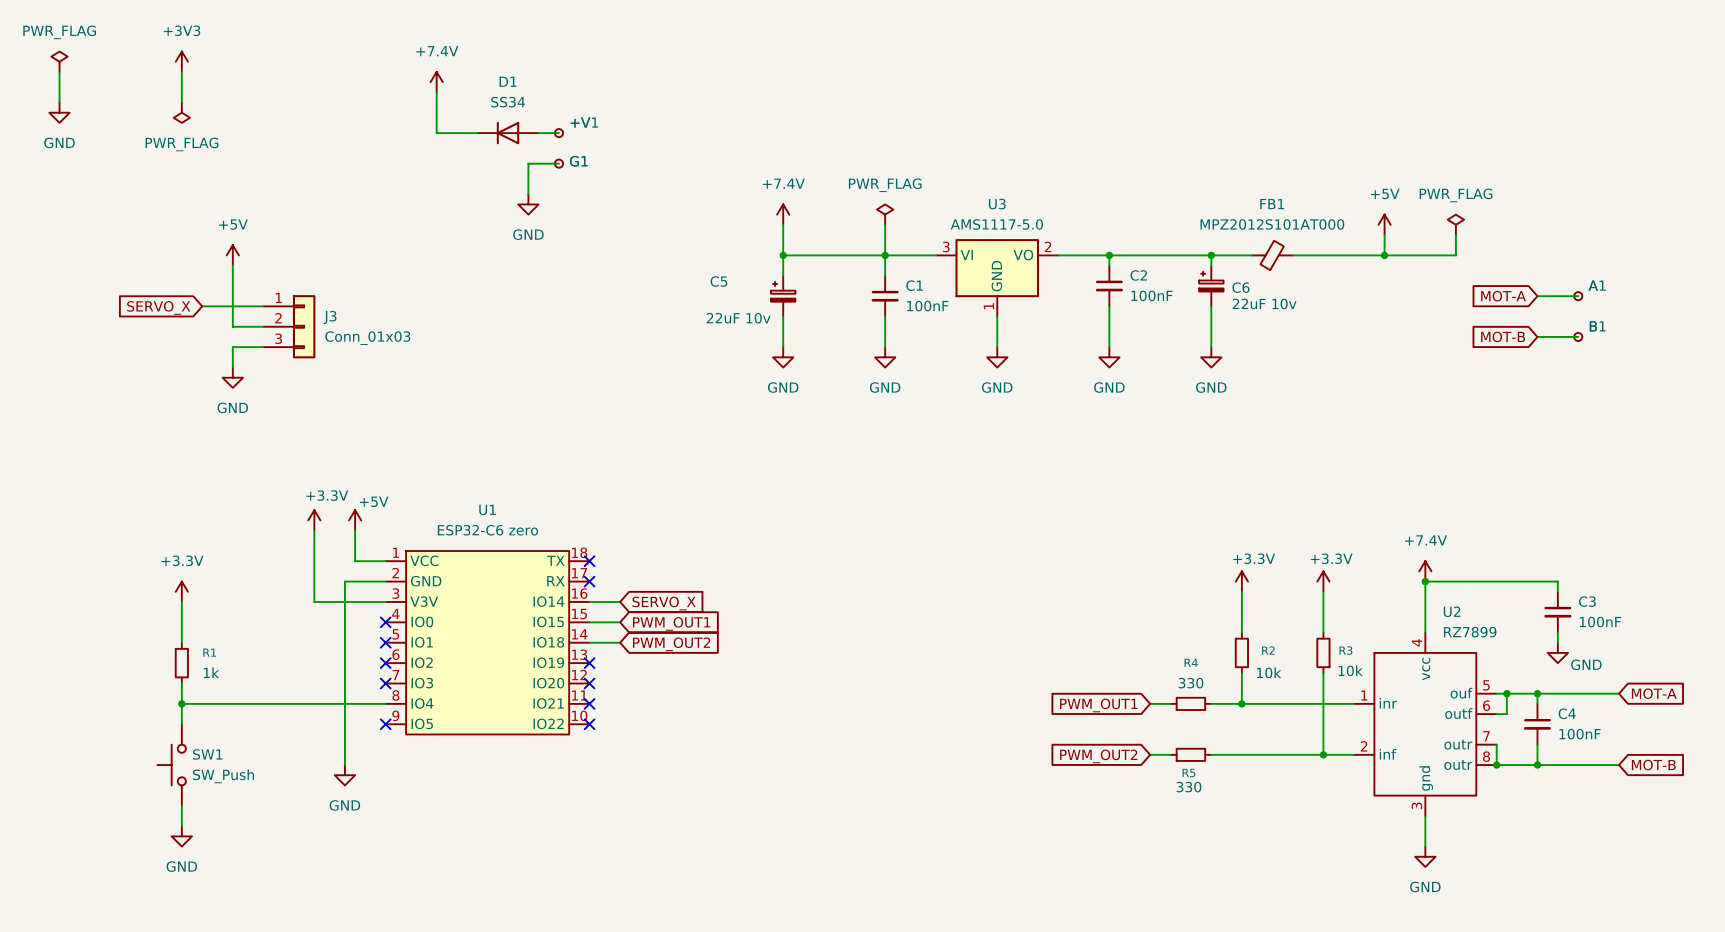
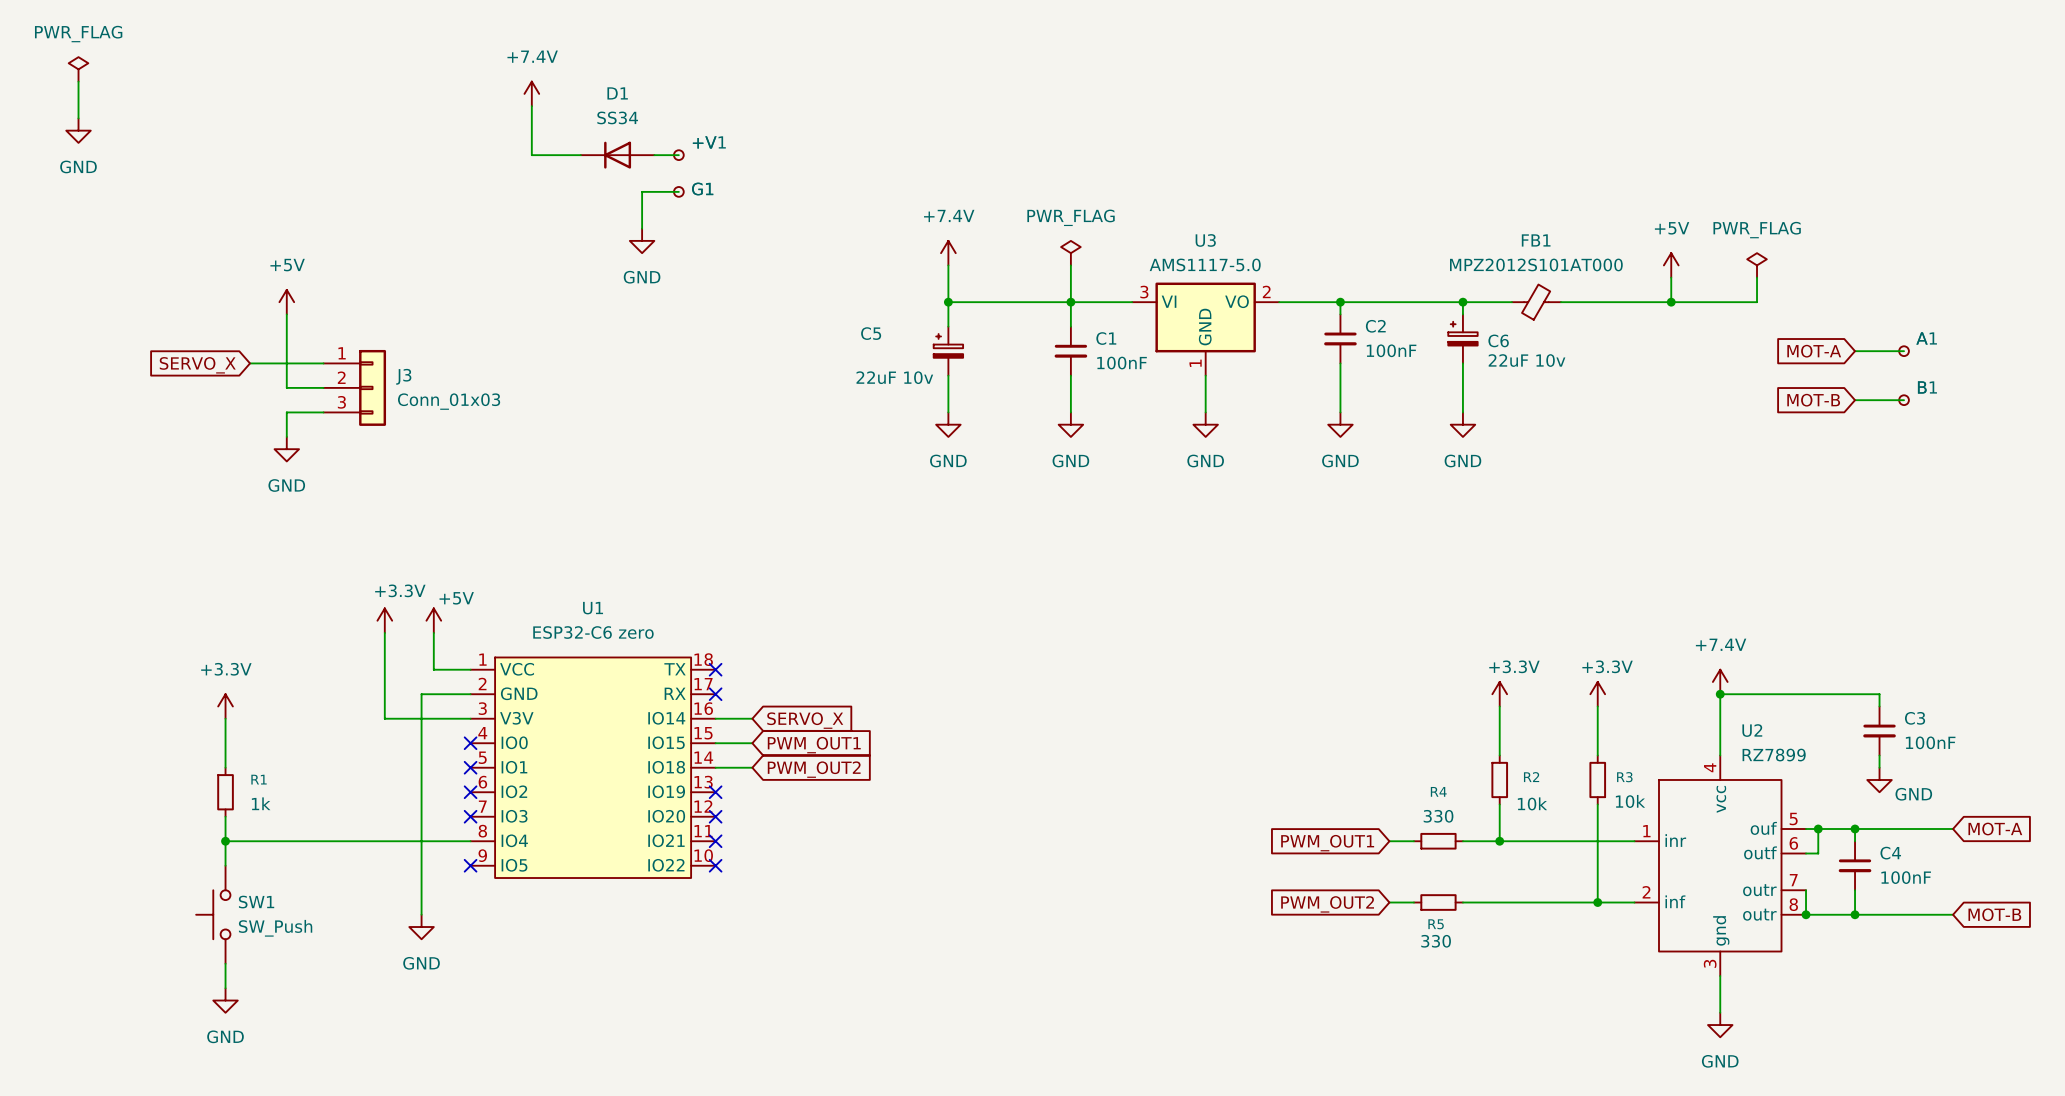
power symbol: +3V3 (181, 61) -> none
wire: (181, 71) (181, 102) -> none
power symbol: PWR_FLAG (181, 112) -> none

